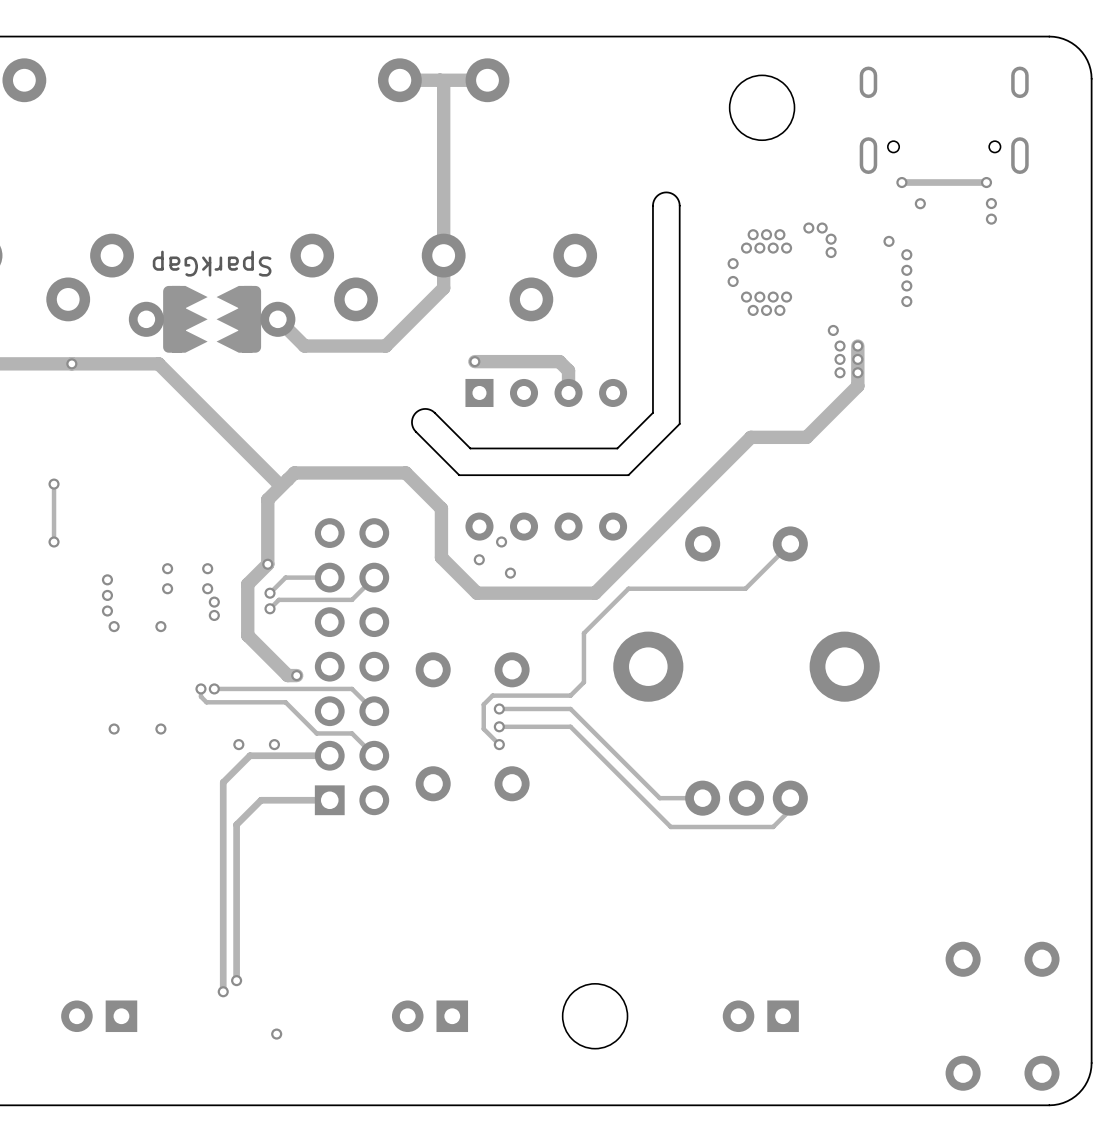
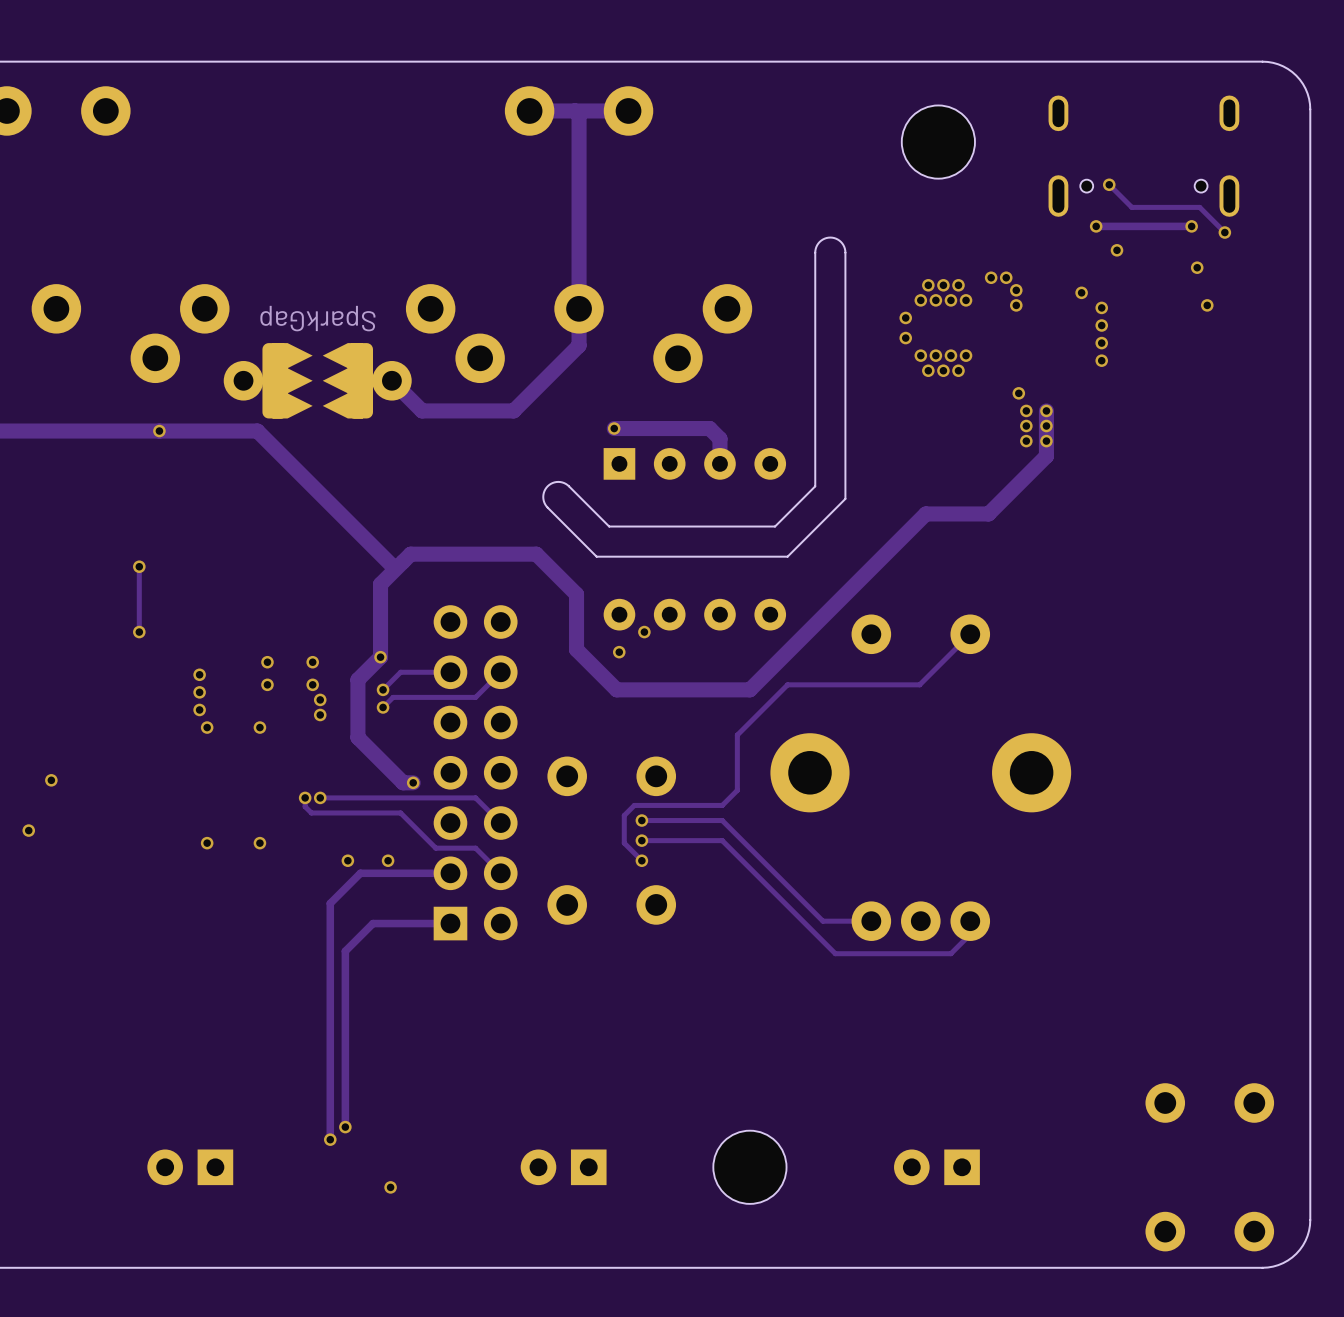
track: none -> (1109, 184) (1131, 207) (1199, 207) (1224, 232)
via: none -> (1109, 184)
via: none -> (1224, 232)
via: (991, 203) -> none
via: none -> (1207, 305)
via: (510, 573) -> none

